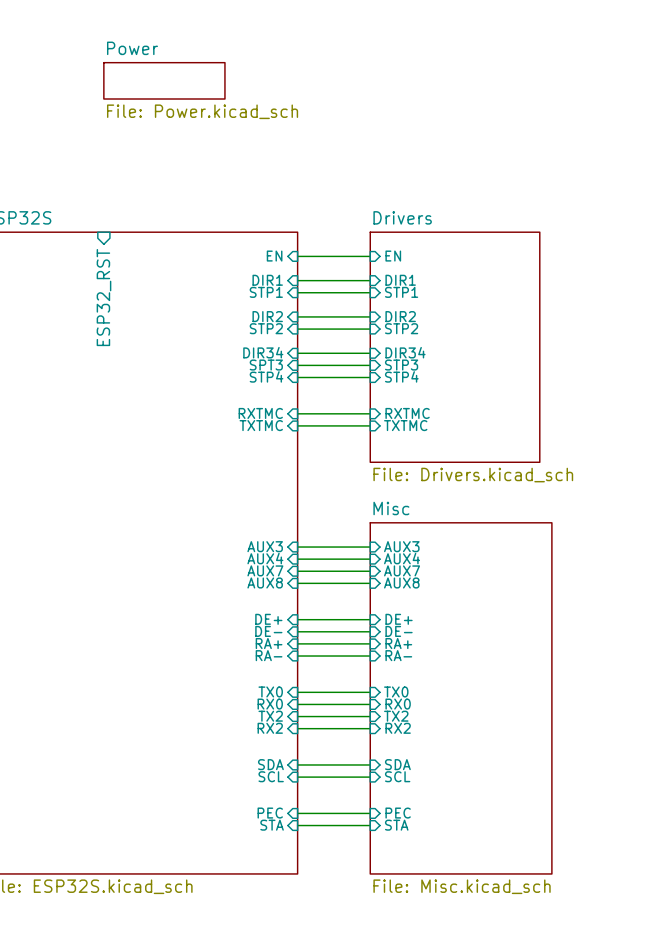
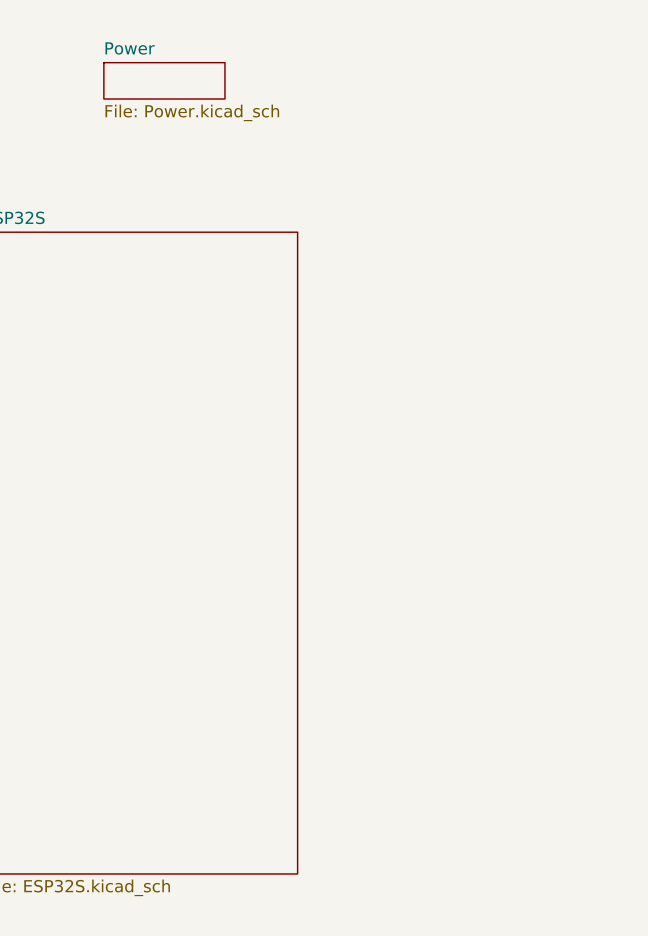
sheet pin: EN (274, 256) -> none
wire: (297, 256) (370, 256) -> none
sheet pin: EN (393, 256) -> none
sheet pin: DIR1 (267, 280) -> none
wire: (297, 280) (370, 280) -> none
sheet pin: DIR1 (400, 280) -> none
sheet pin: STP1 (266, 292) -> none
wire: (297, 292) (370, 292) -> none
sheet pin: STP1 (401, 292) -> none
sheet pin: ESP32_RST (103, 297) -> none
sheet pin: DIR2 (267, 316) -> none
wire: (297, 316) (370, 316) -> none
sheet pin: DIR2 (400, 316) -> none
sheet pin: STP2 (266, 328) -> none
sheet pin: STP2 (401, 328) -> none
wire: (297, 329) (370, 329) -> none
sheet Drivers: File: Drivers.kicad_sch (455, 347) -> none
sheet pin: DIR34 (263, 352) -> none
sheet pin: DIR34 (405, 352) -> none
wire: (297, 353) (370, 353) -> none
sheet pin: SPT3 (266, 365) -> none
wire: (297, 365) (370, 365) -> none
sheet pin: STP3 (401, 365) -> none
sheet pin: STP4 (266, 376) -> none
sheet pin: STP4 (401, 376) -> none
wire: (297, 377) (370, 377) -> none
sheet pin: RXTMC (260, 413) -> none
wire: (297, 413) (370, 413) -> none
sheet pin: RXTMC (407, 413) -> none
sheet pin: TXTMC (261, 425) -> none
wire: (297, 425) (370, 425) -> none
sheet pin: TXTMC (405, 425) -> none
sheet pin: AUX3 (265, 546) -> none
sheet pin: AUX3 (401, 546) -> none
wire: (297, 547) (370, 547) -> none
sheet pin: AUX4 (265, 558) -> none
sheet pin: AUX4 (402, 558) -> none
wire: (297, 559) (370, 559) -> none
sheet pin: AUX7 (265, 570) -> none
sheet pin: AUX7 (402, 570) -> none
wire: (297, 571) (370, 571) -> none
sheet pin: AUX8 (265, 582) -> none
sheet pin: AUX8 (401, 582) -> none
wire: (297, 583) (370, 583) -> none
sheet pin: DE+ (268, 619) -> none
wire: (297, 619) (370, 619) -> none
sheet pin: DE+ (399, 619) -> none
sheet pin: DE- (268, 631) -> none
wire: (297, 631) (370, 631) -> none
sheet pin: DE- (399, 631) -> none
sheet pin: RA+ (269, 643) -> none
wire: (297, 643) (370, 643) -> none
sheet pin: RA+ (398, 643) -> none
sheet pin: RA- (269, 655) -> none
sheet pin: RA- (398, 655) -> none
wire: (297, 656) (370, 656) -> none
sheet pin: TX0 (270, 691) -> none
sheet pin: TX0 (396, 691) -> none
wire: (297, 692) (370, 692) -> none
sheet Misc: File: Misc.kicad_sch (461, 698) -> none
sheet pin: RX0 (270, 704) -> none
wire: (297, 704) (370, 704) -> none
sheet pin: RX0 (398, 704) -> none
sheet pin: TX2 (270, 716) -> none
wire: (297, 716) (370, 716) -> none
sheet pin: TX2 (396, 716) -> none
sheet pin: RX2 (270, 728) -> none
wire: (297, 728) (370, 728) -> none
sheet pin: RX2 (398, 728) -> none
sheet pin: SDA (270, 764) -> none
wire: (297, 764) (370, 764) -> none
sheet pin: SDA (397, 764) -> none
sheet pin: SCL (271, 776) -> none
sheet pin: SCL (397, 776) -> none
wire: (297, 777) (370, 777) -> none
sheet pin: PEC (270, 813) -> none
wire: (297, 813) (370, 813) -> none
sheet pin: PEC (398, 813) -> none
sheet pin: STA (272, 825) -> none
wire: (297, 825) (370, 825) -> none
sheet pin: STA (396, 825) -> none

